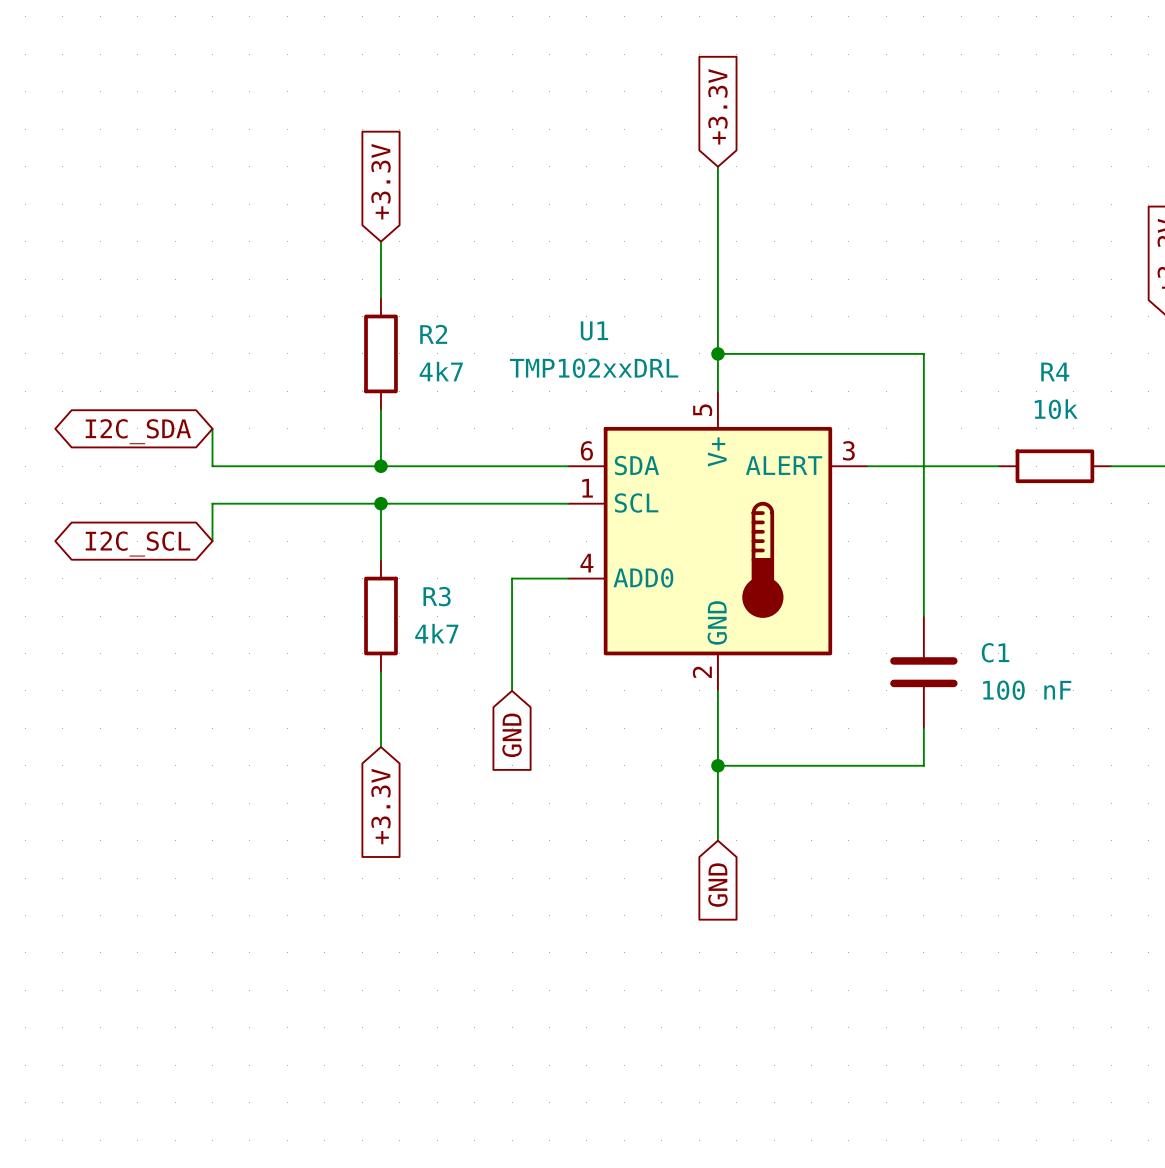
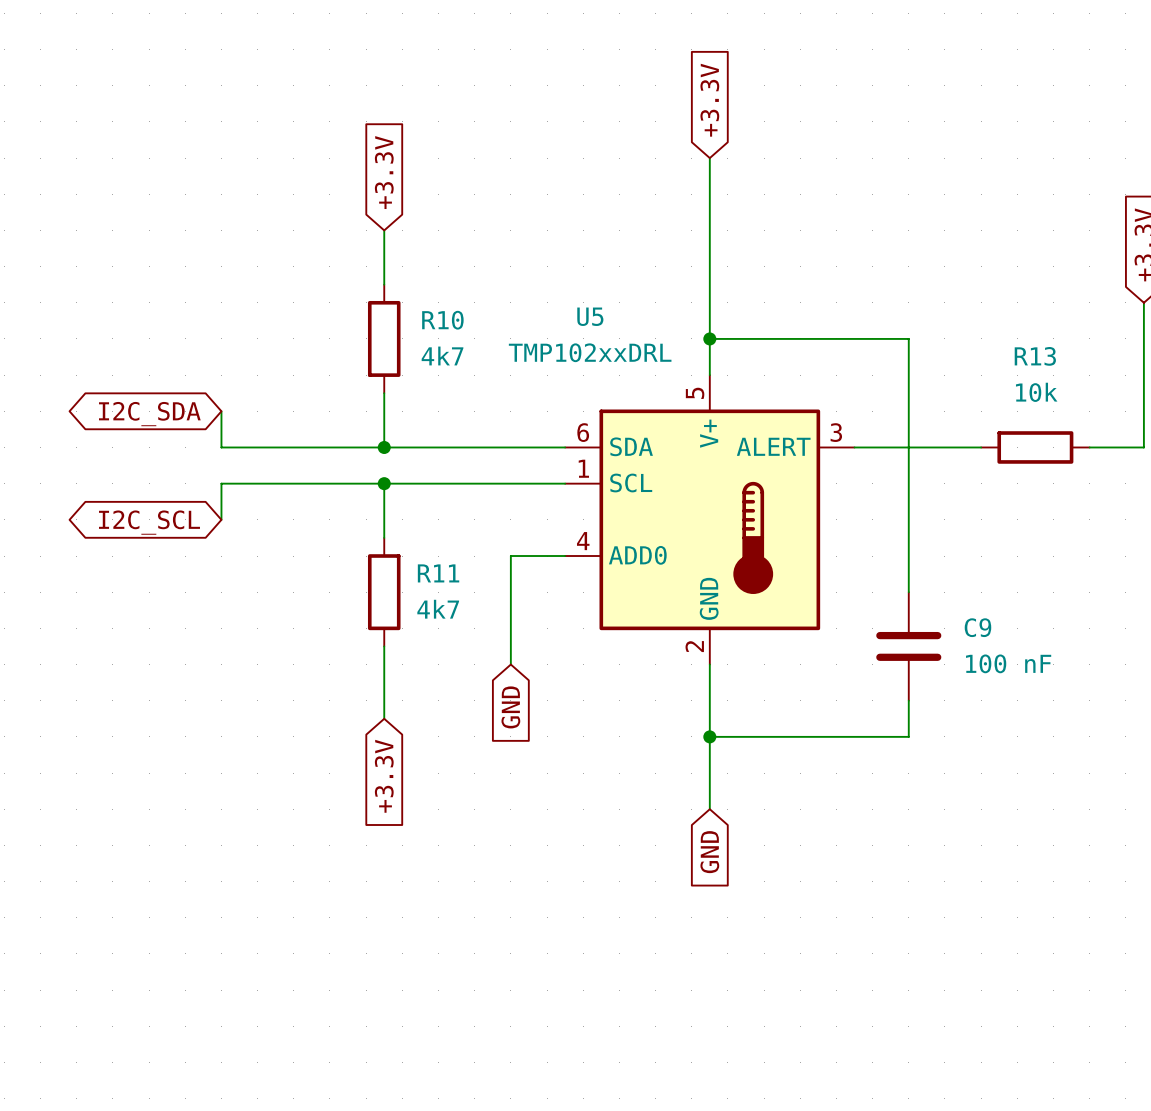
U1 name: U1 (594, 330) -> U5 (590, 316)
R2 name: R2 (433, 334) -> R10 (442, 320)
R4 name: R4 (1055, 371) -> R13 (1035, 356)
R3 name: R3 (437, 596) -> R11 (438, 573)
C1 name: C1 (995, 652) -> C9 (977, 627)

